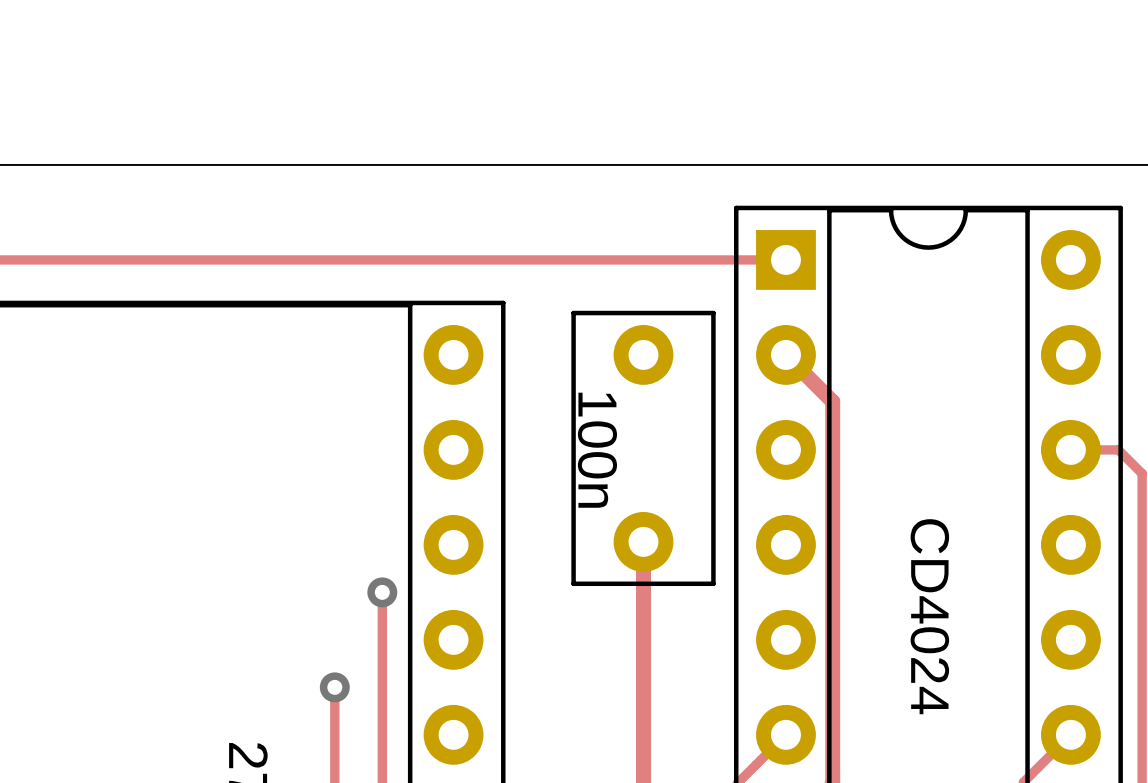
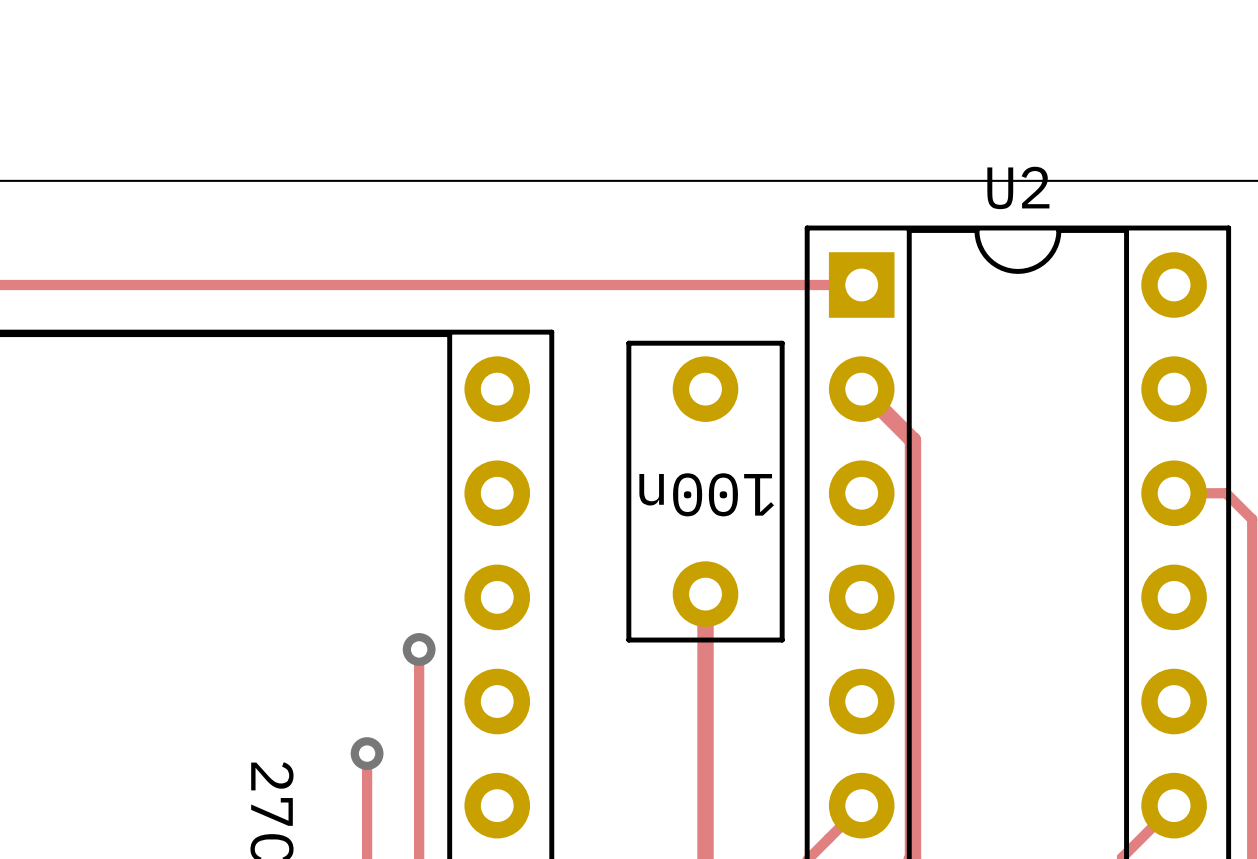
U2 name: none -> U2 (1018, 187)
part value rotation: 0° (597, 450) -> 90° clockwise (706, 494)
U2 value: CD4024 (929, 616) -> none

